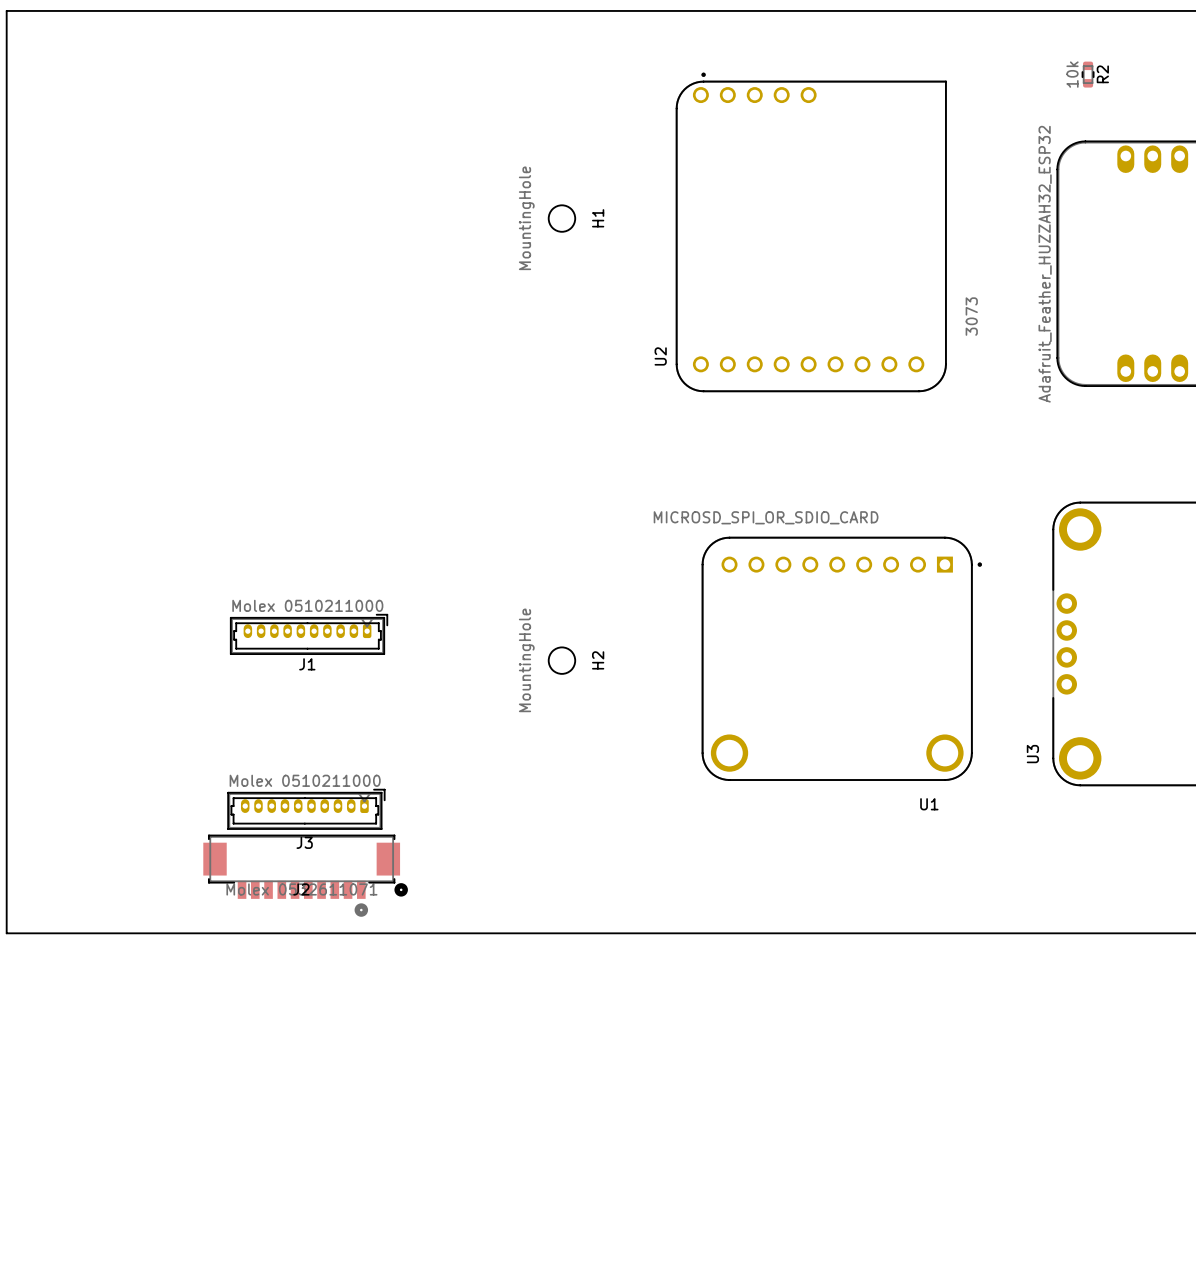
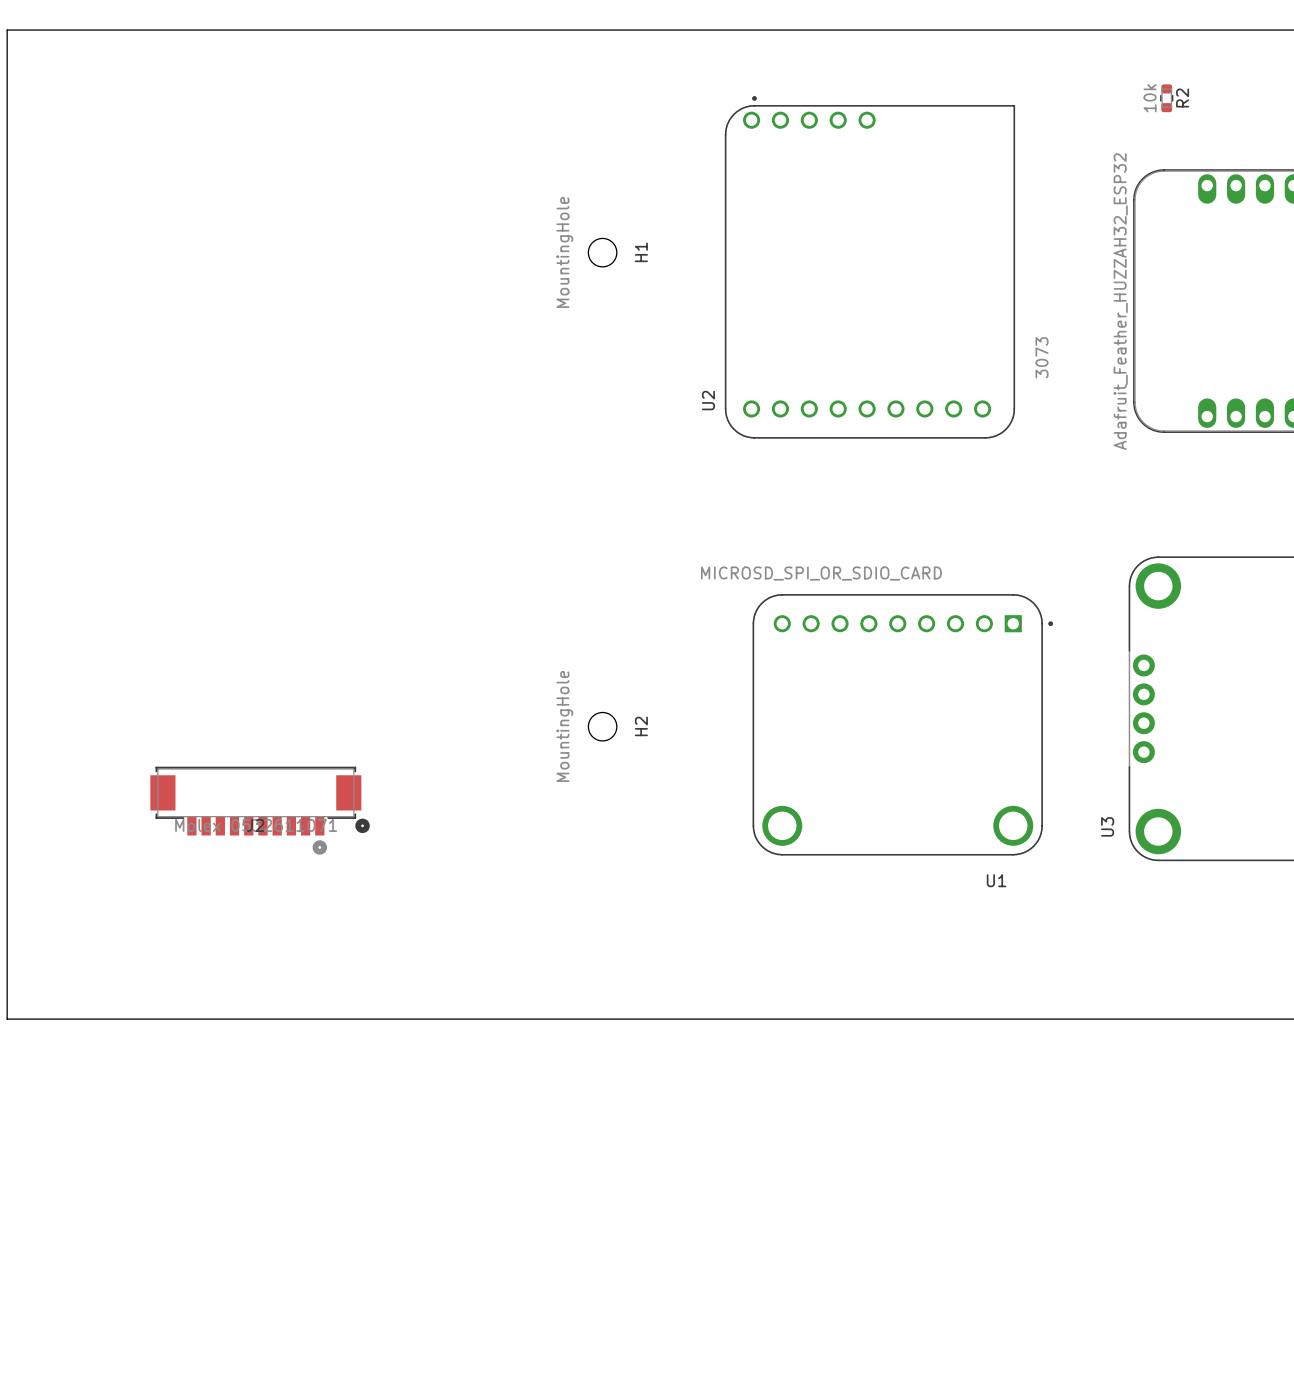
J1: Molex 0510211000 (309, 634) -> none
J3: Molex 0510211000 (306, 809) -> none
J2 position: (305, 875) -> (260, 810)

